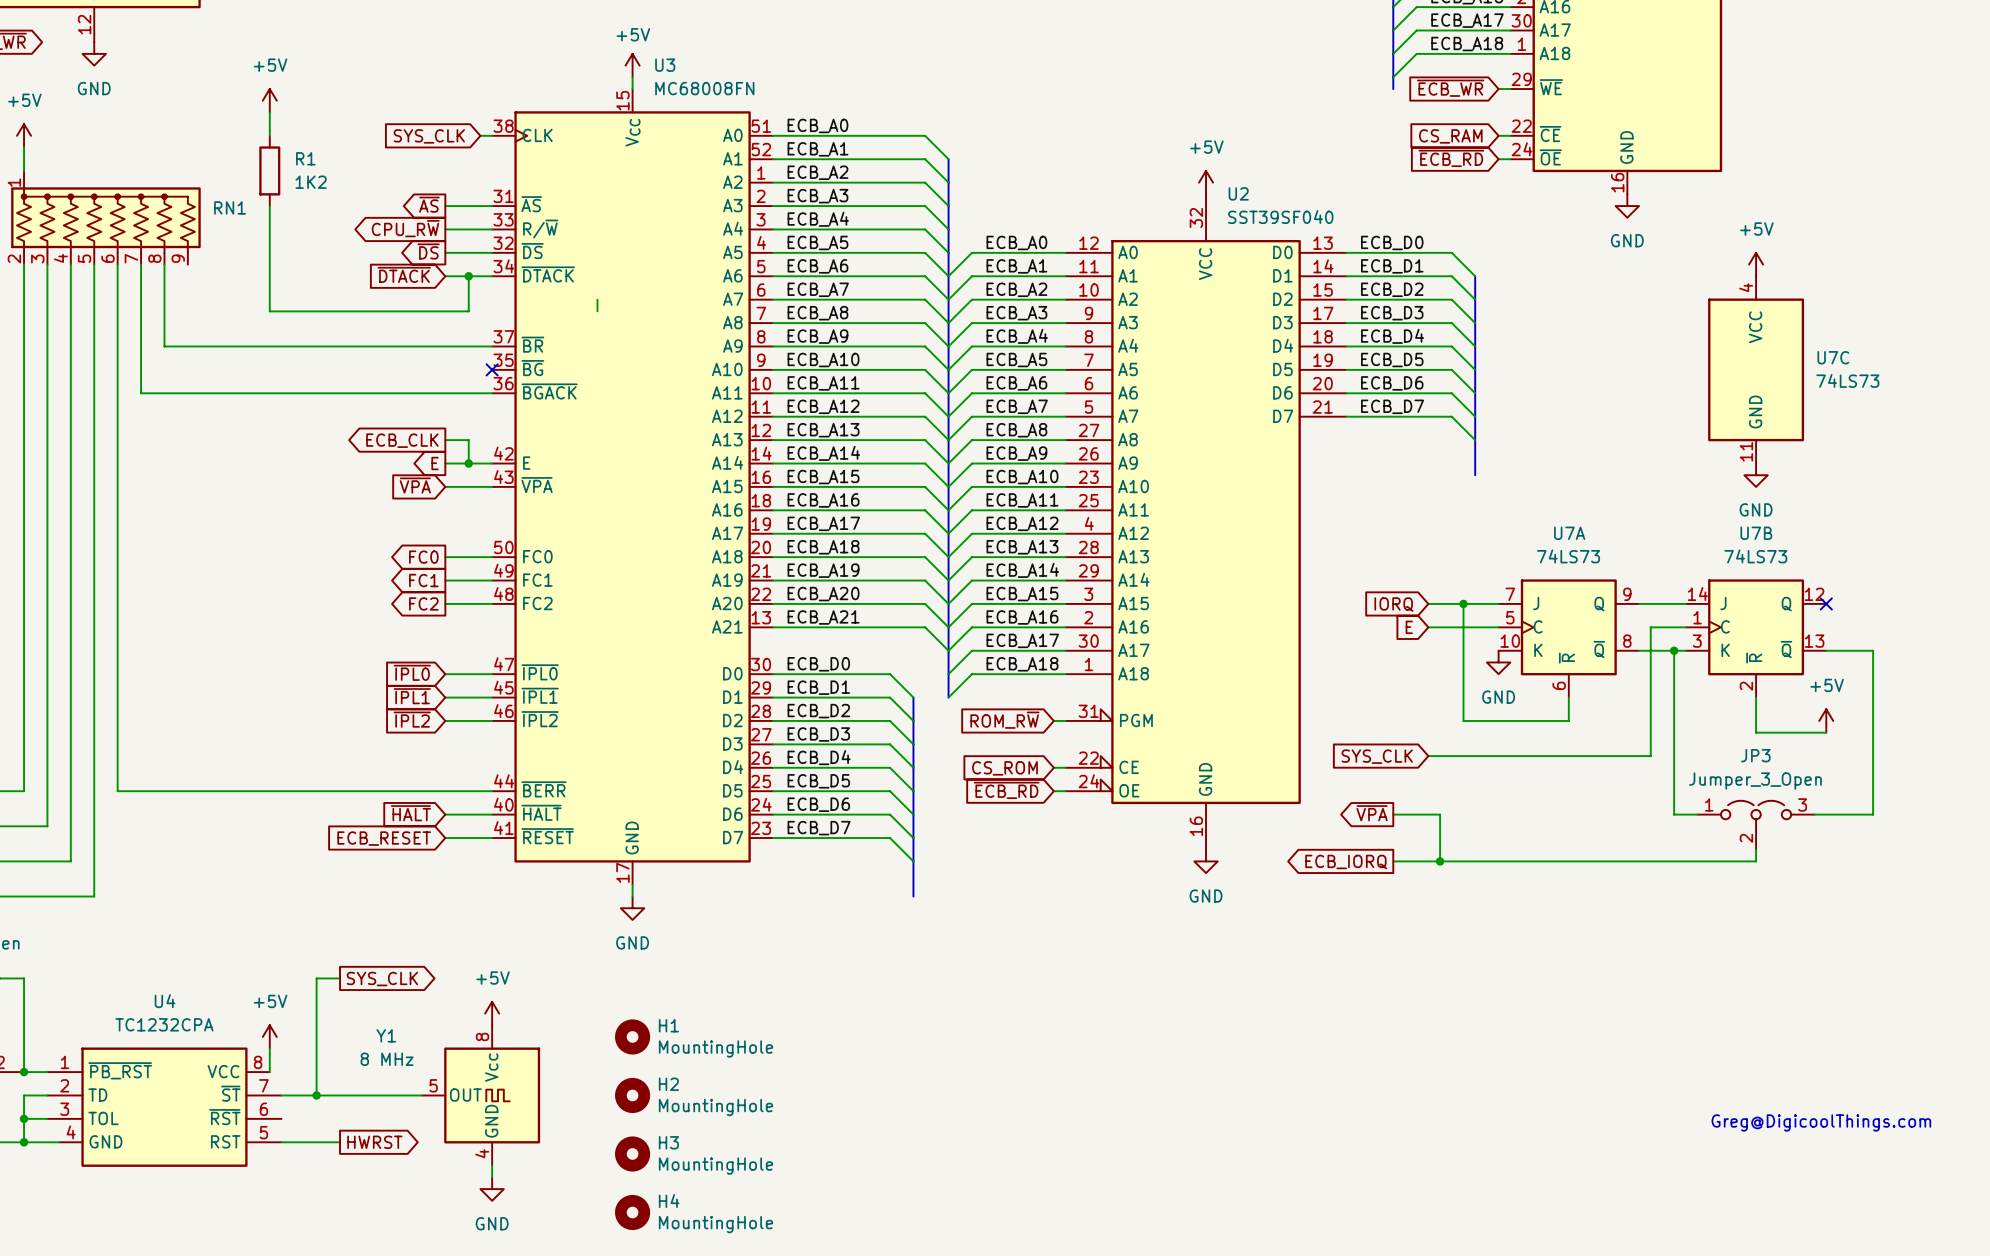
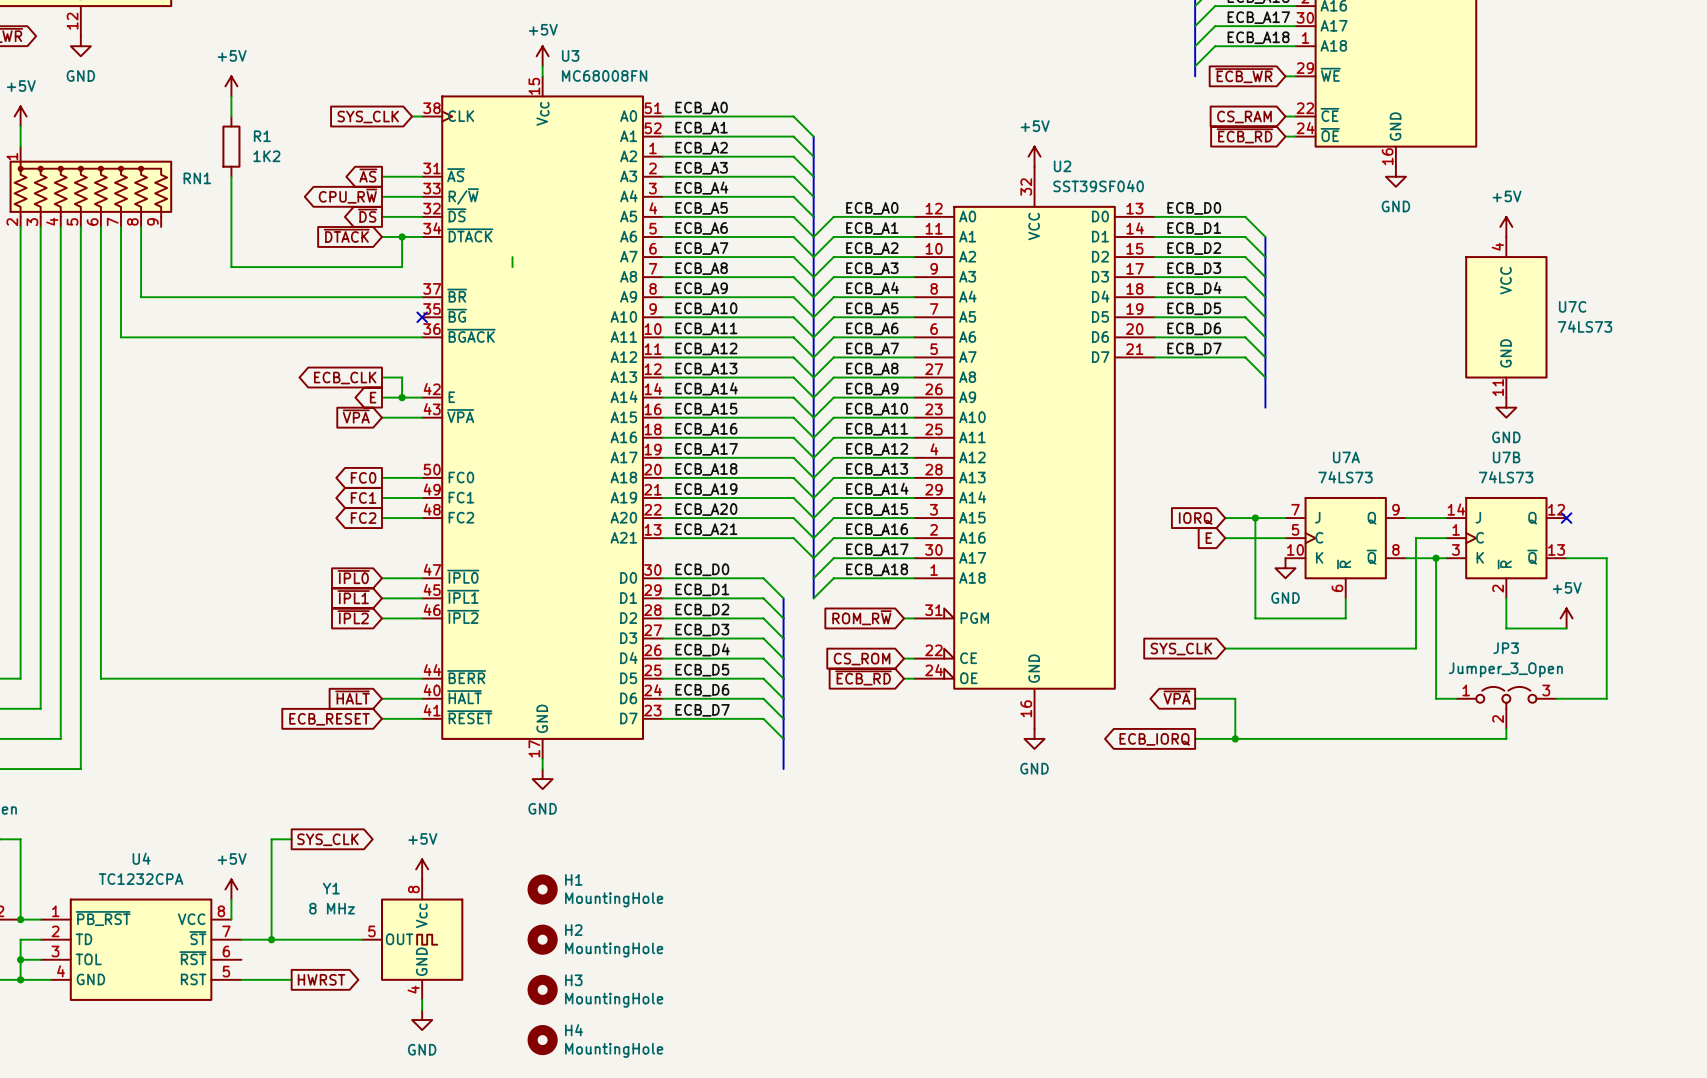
text: Greg@DigicoolThings.com (1821, 1122) -> none

